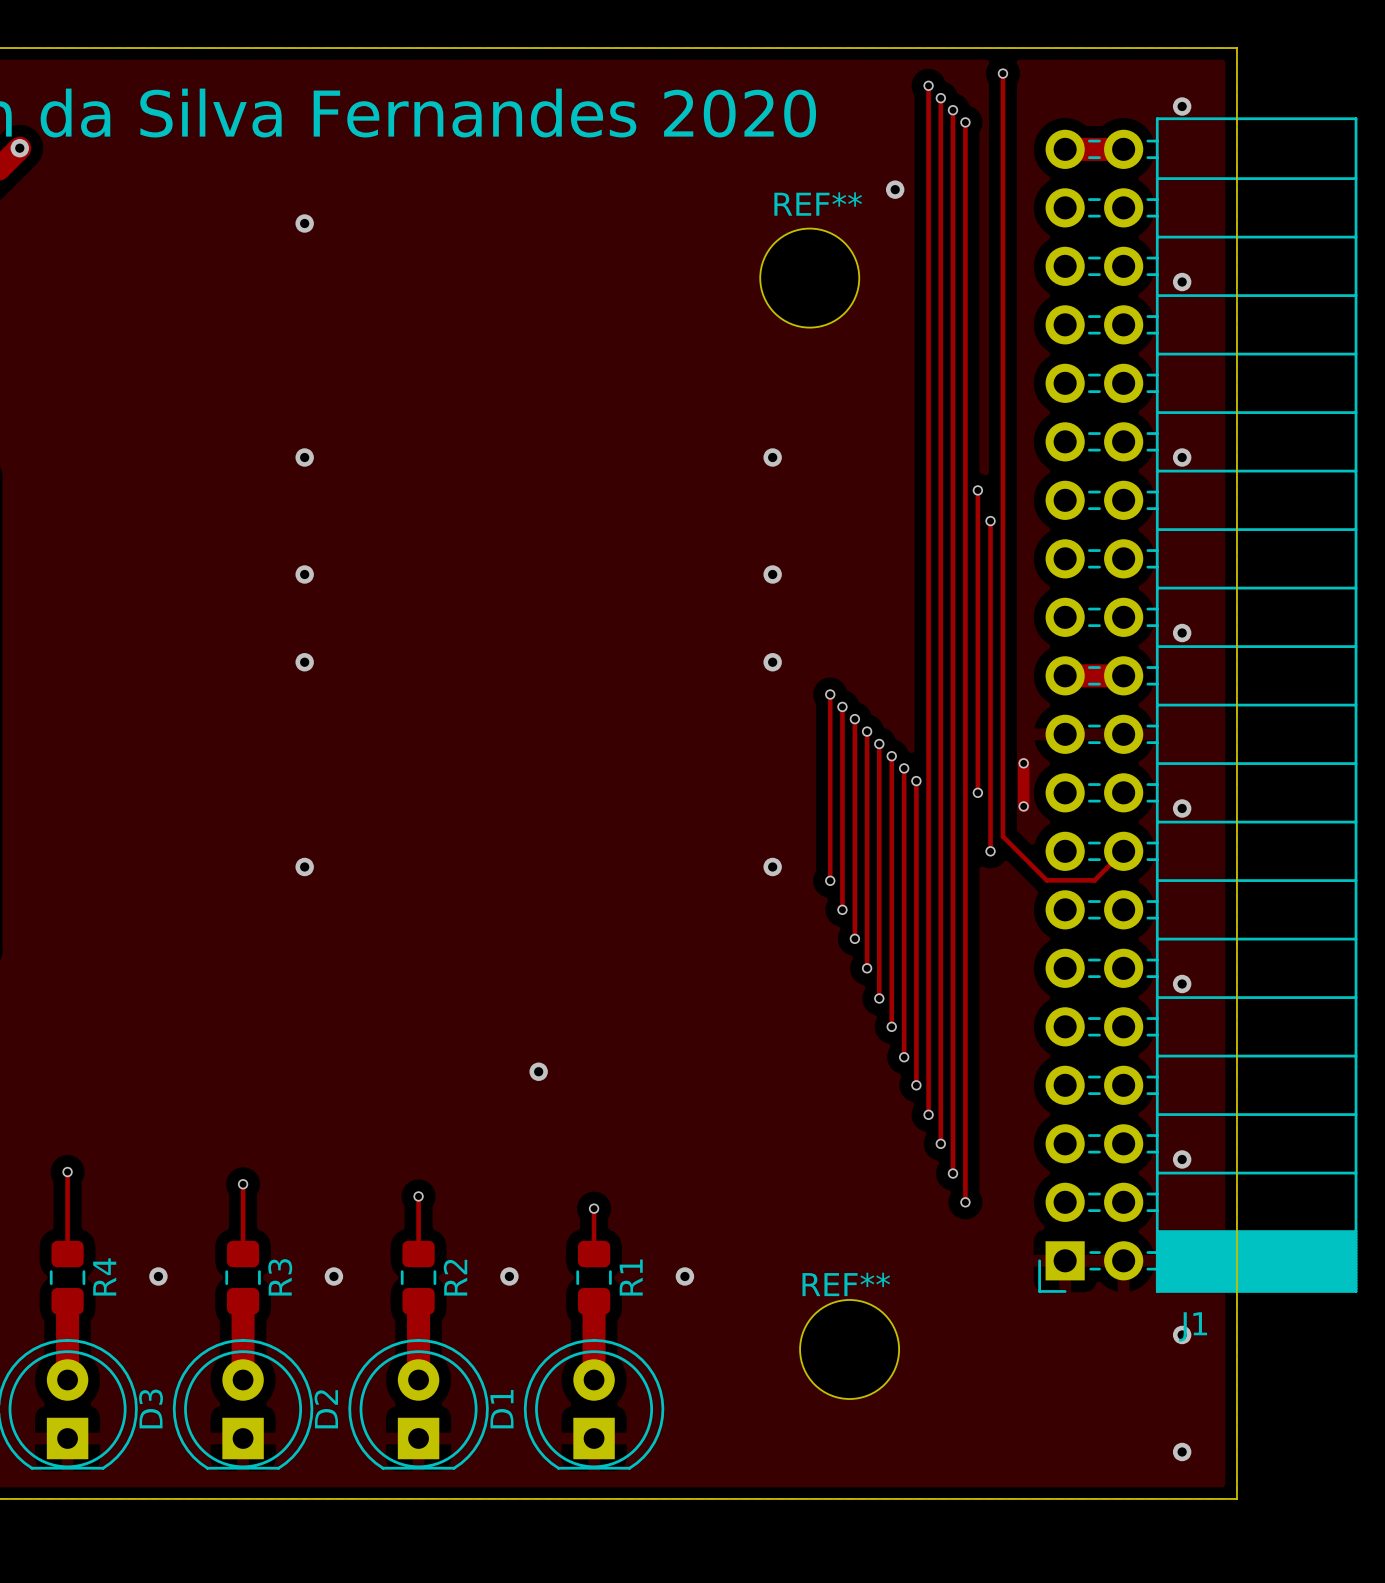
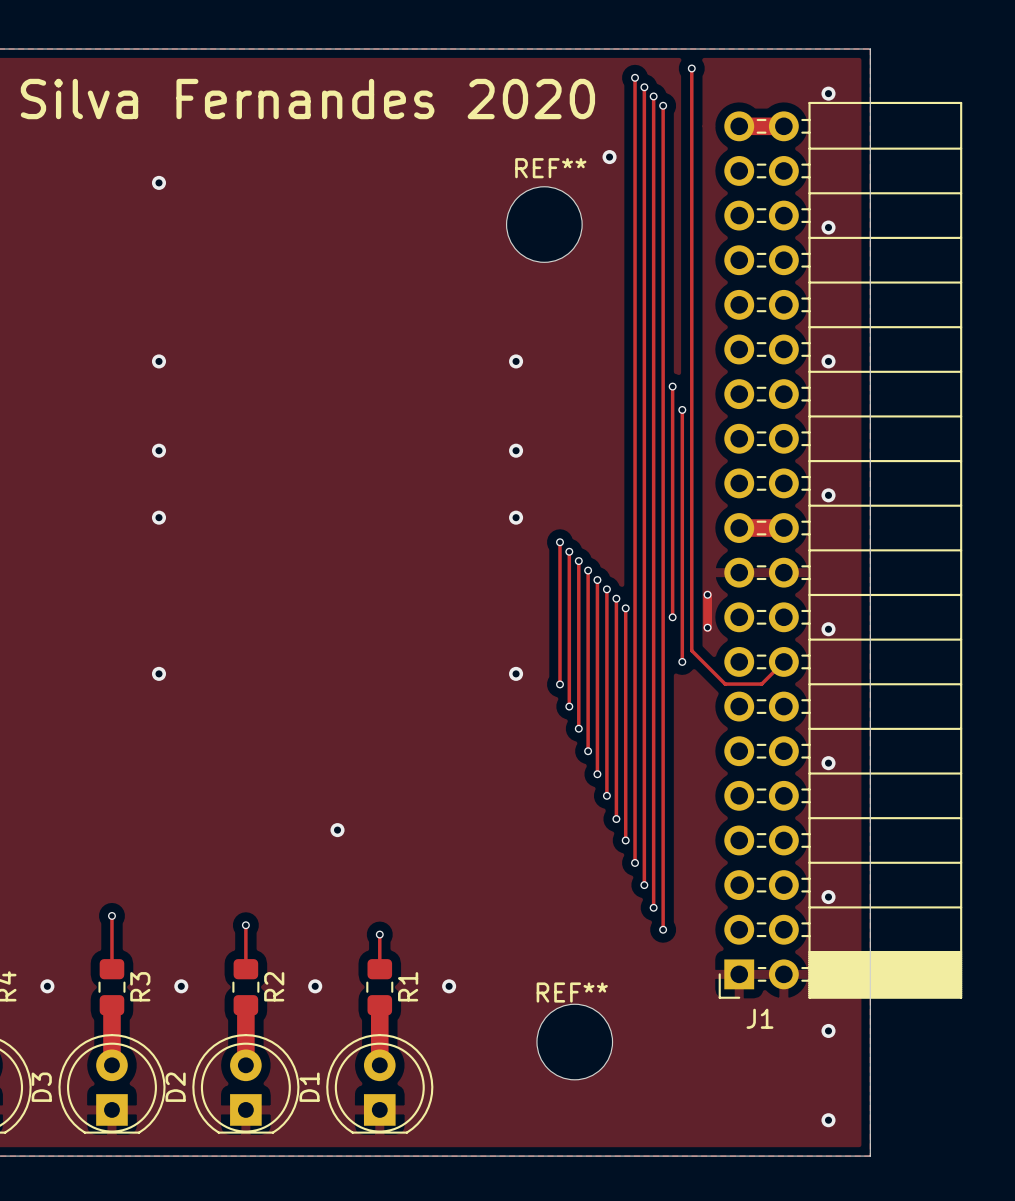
J1 name position: J1 (1193, 1326) -> J1 (759, 1018)

